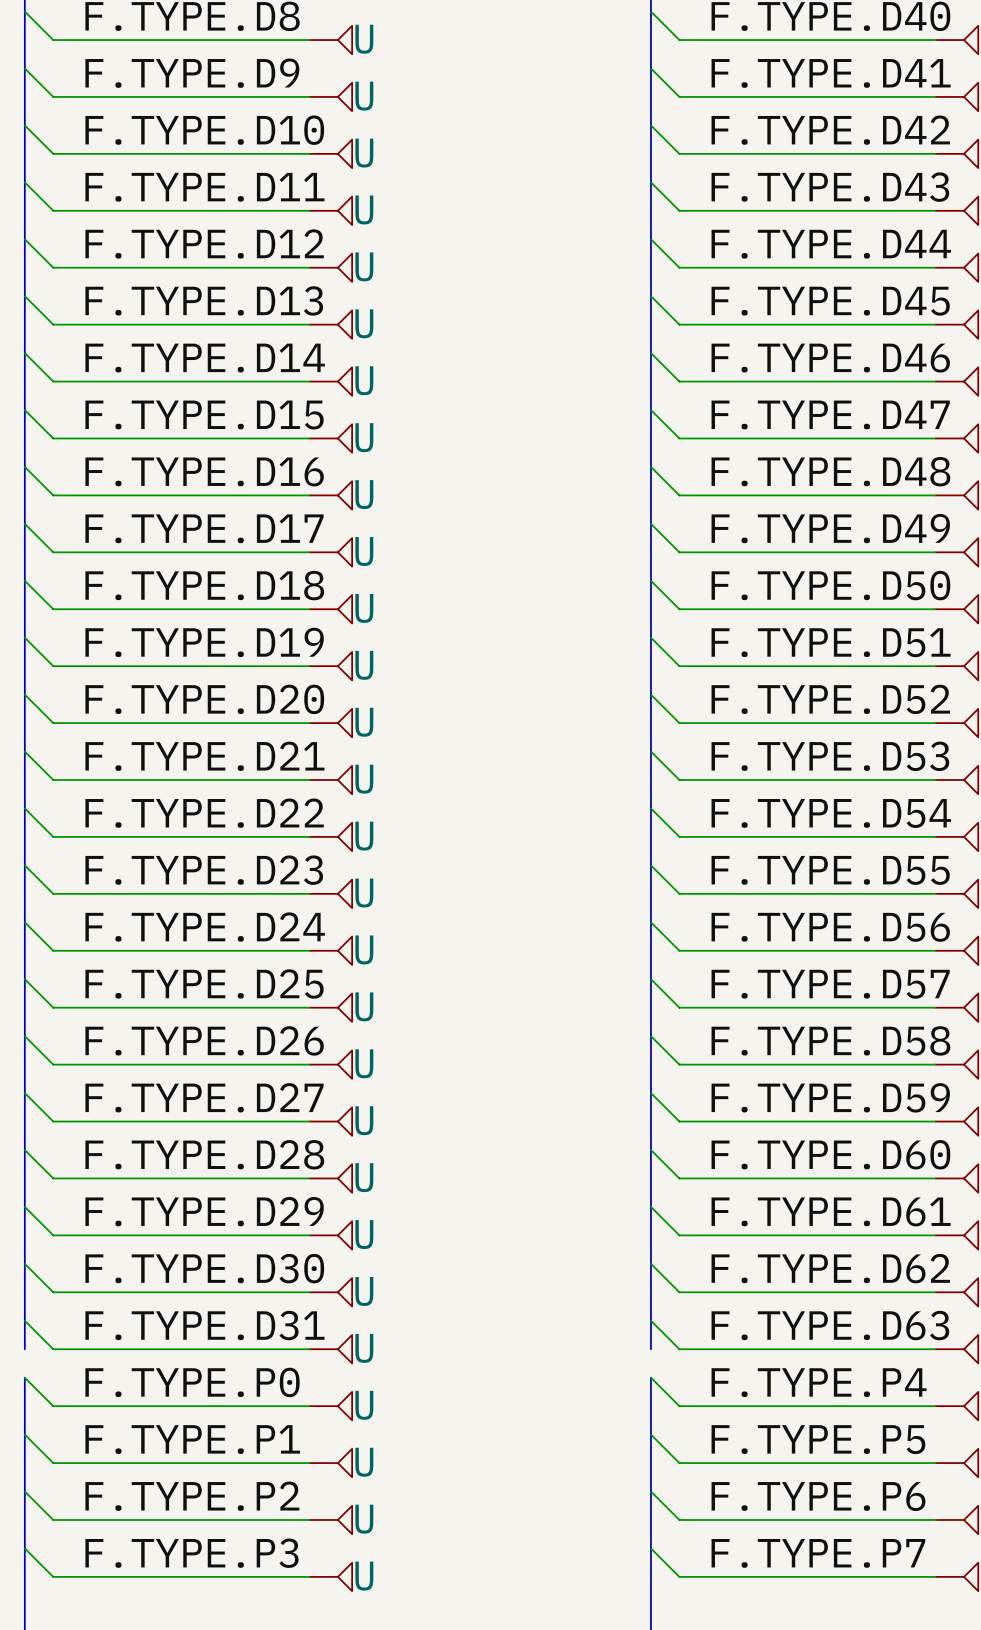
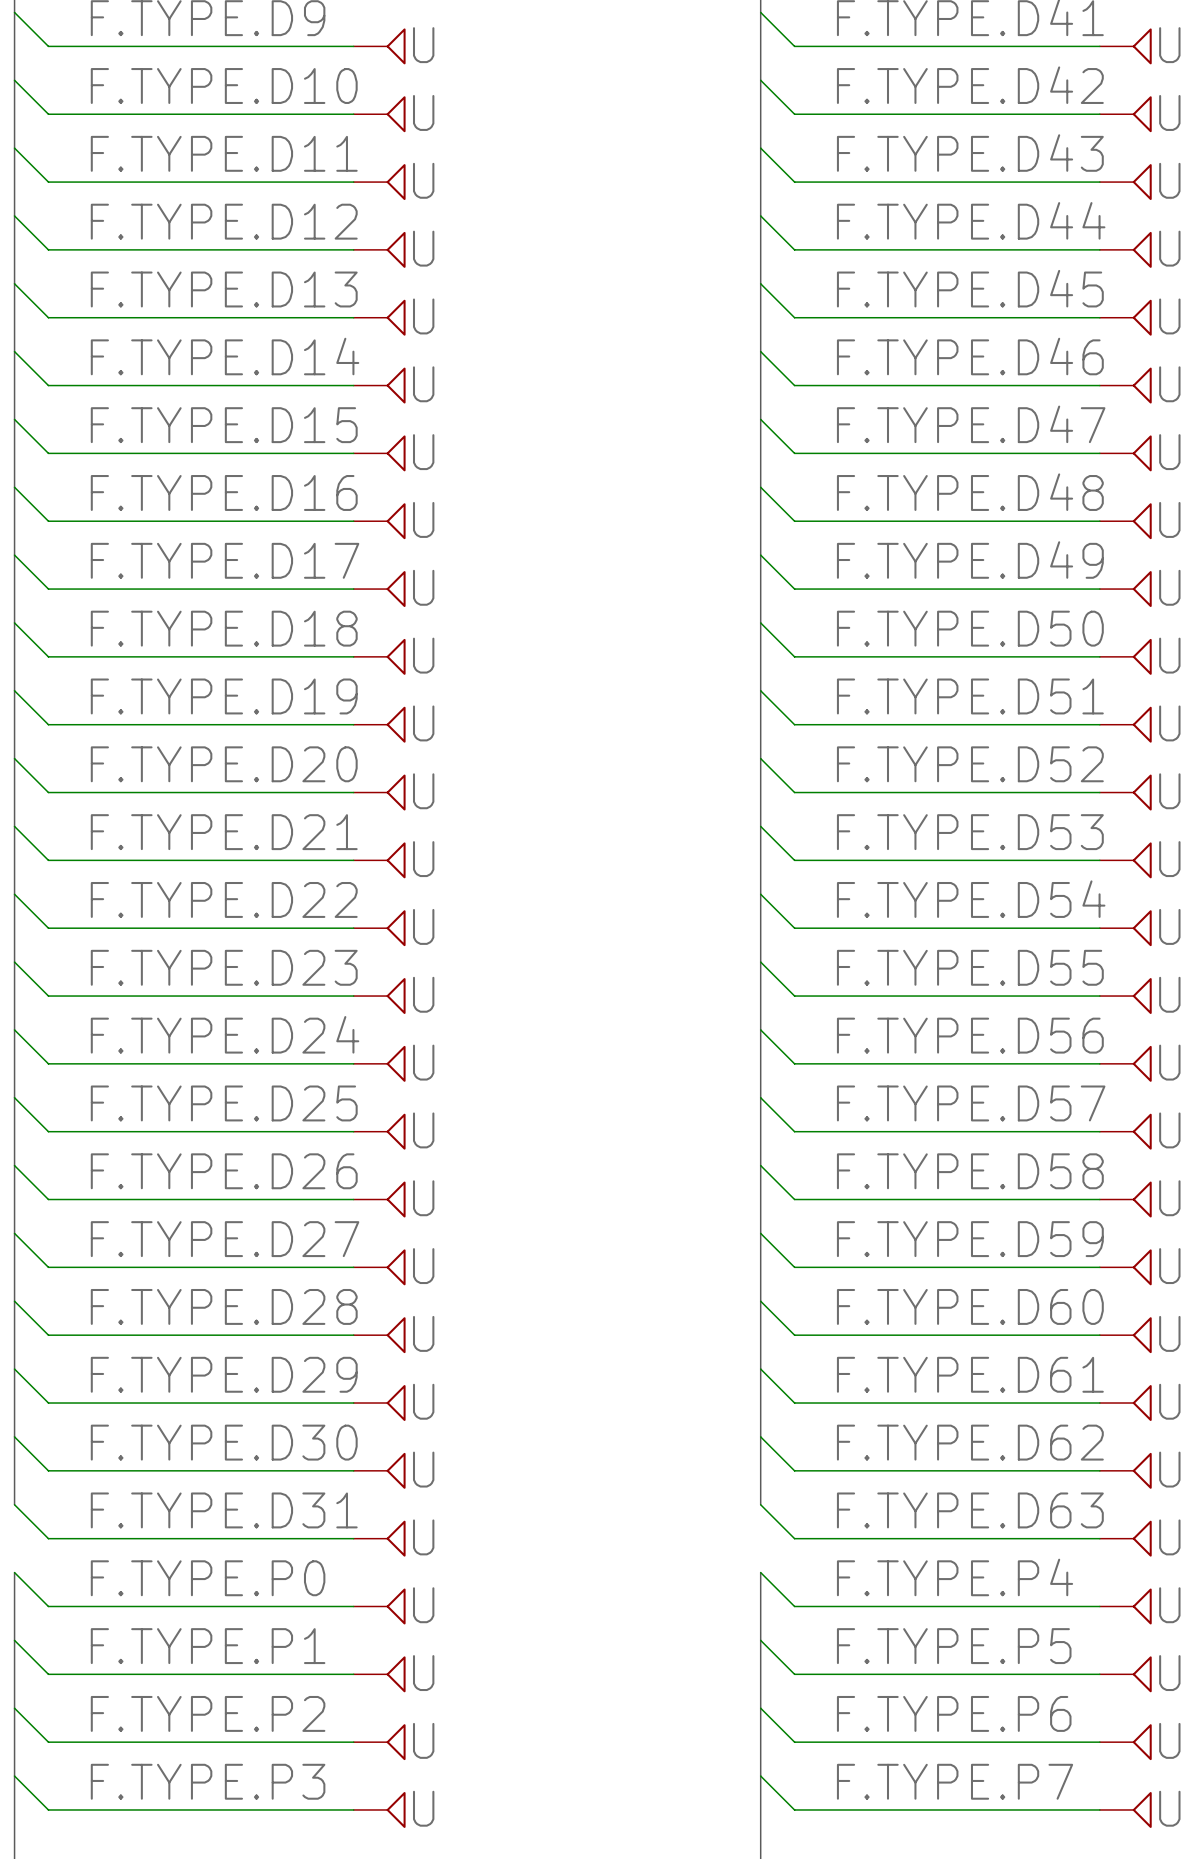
bus: (24, 1320) (24, 1349) -> none
bus: (650, 1320) (650, 1349) -> none

